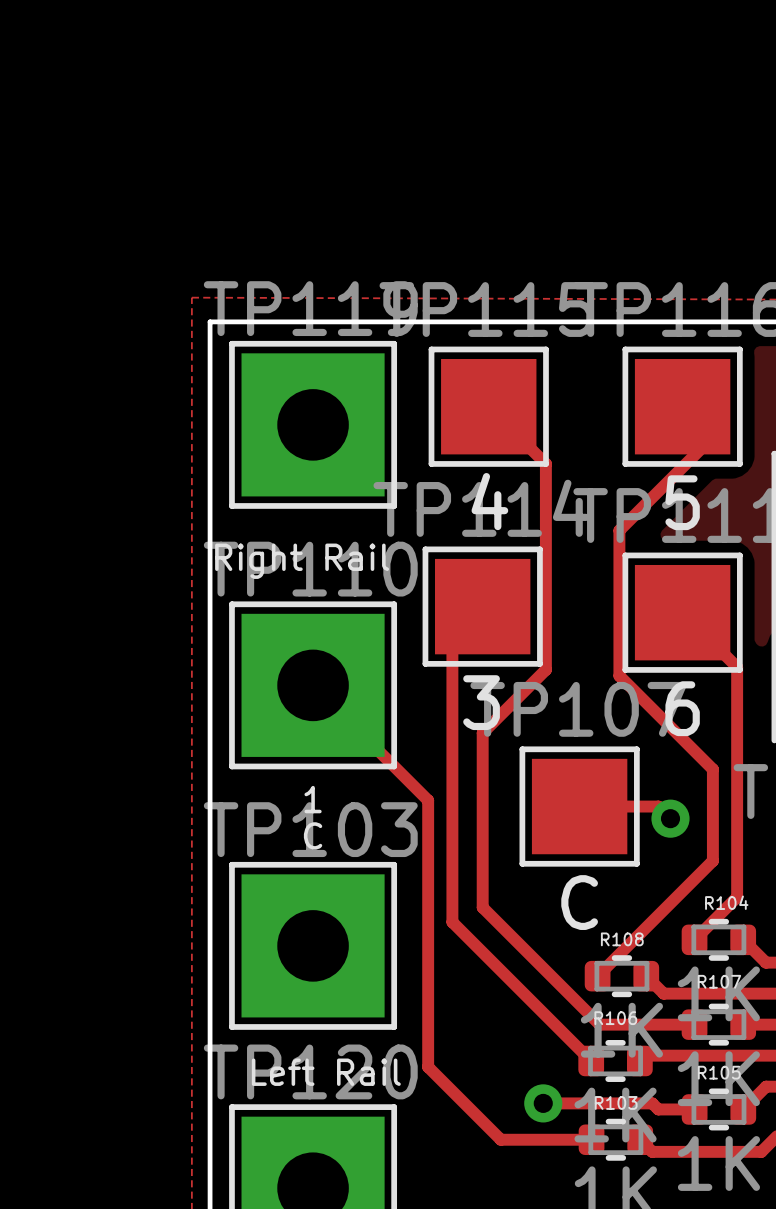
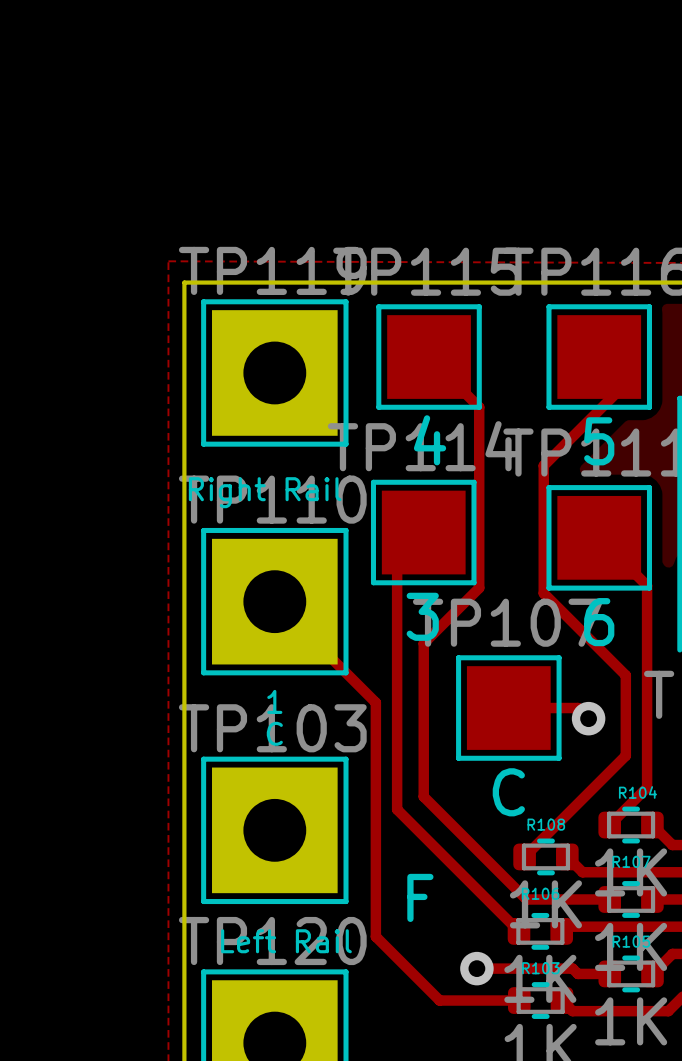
text: none -> F (420, 897)

